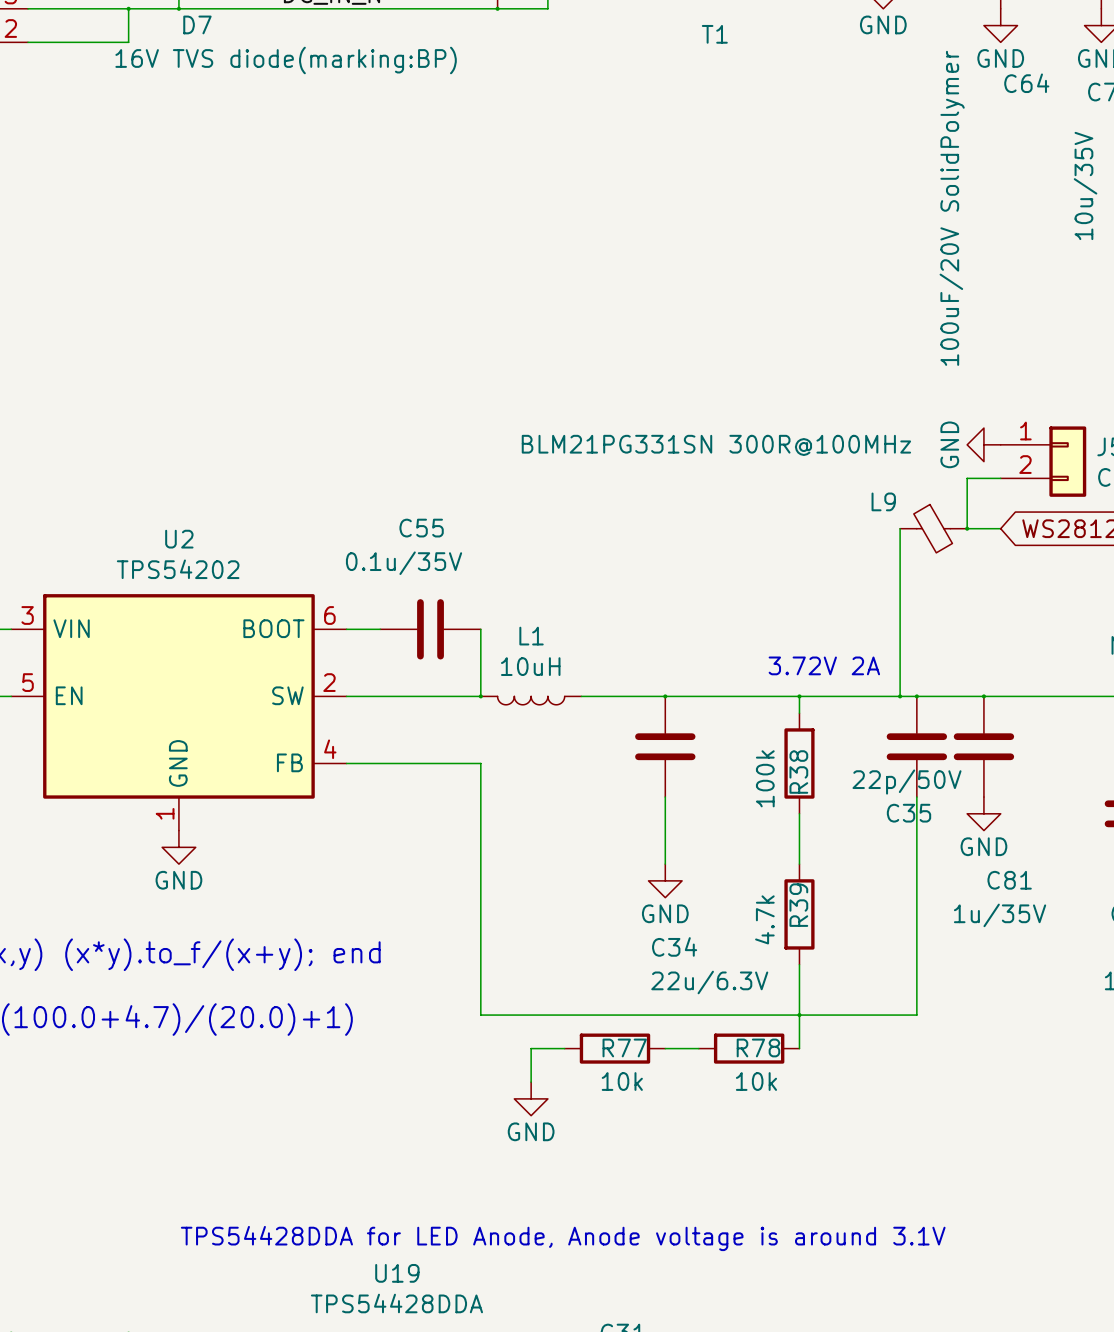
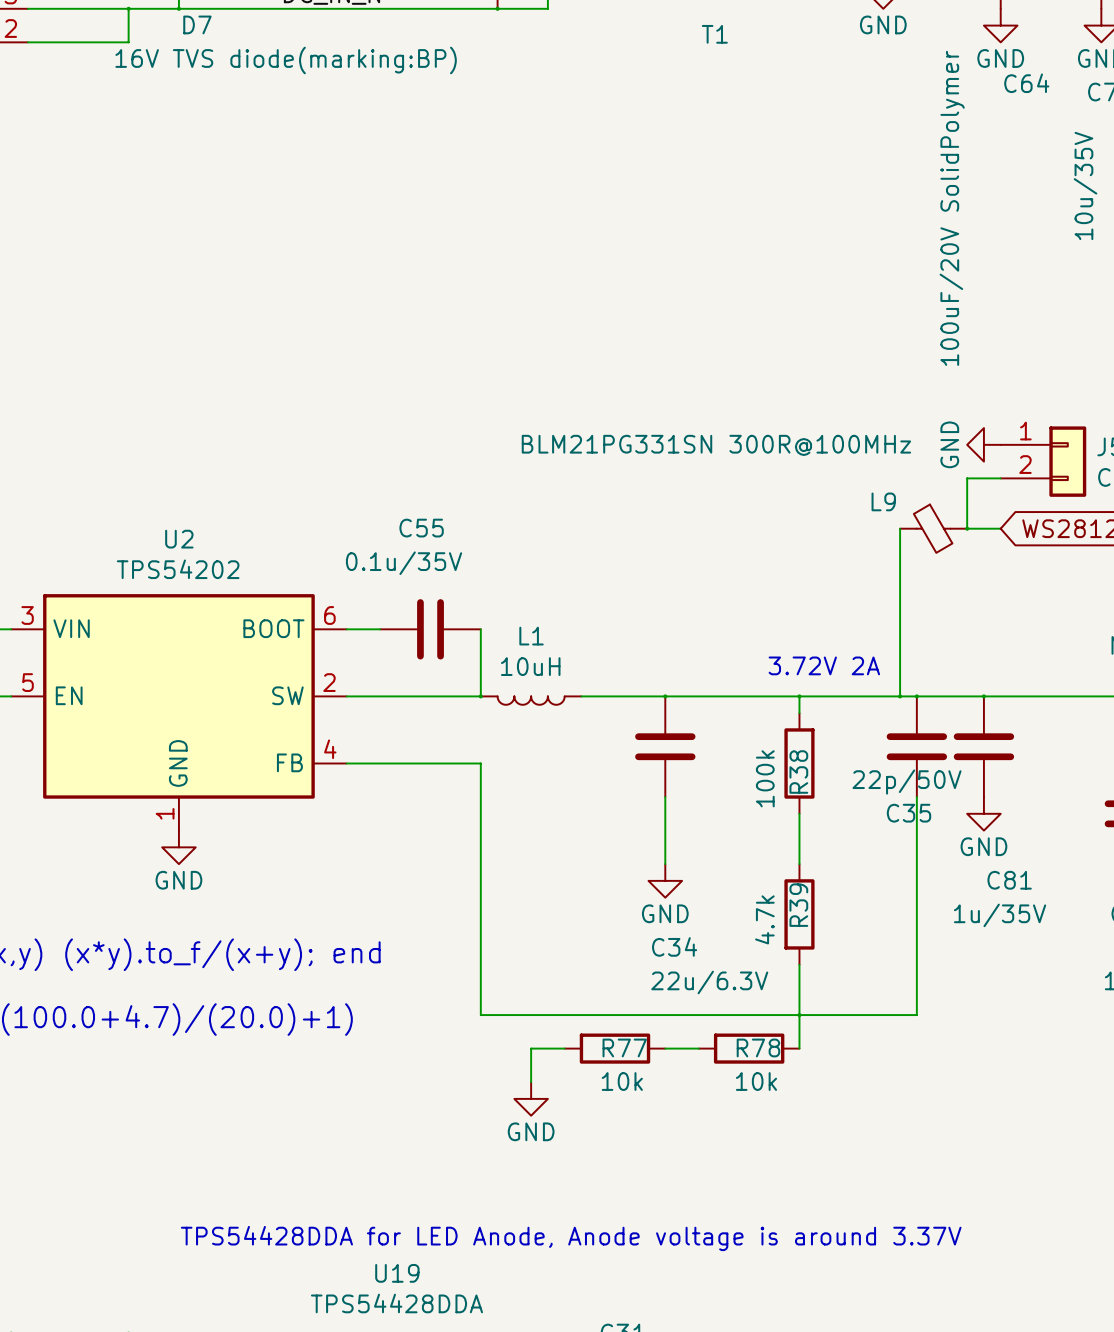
text: TPS54428DDA for LED Anode, Anode voltage is around 3.1V (563, 1238) -> TPS54428DDA for LED Anode, Anode voltage is around 3.37V (571, 1238)

